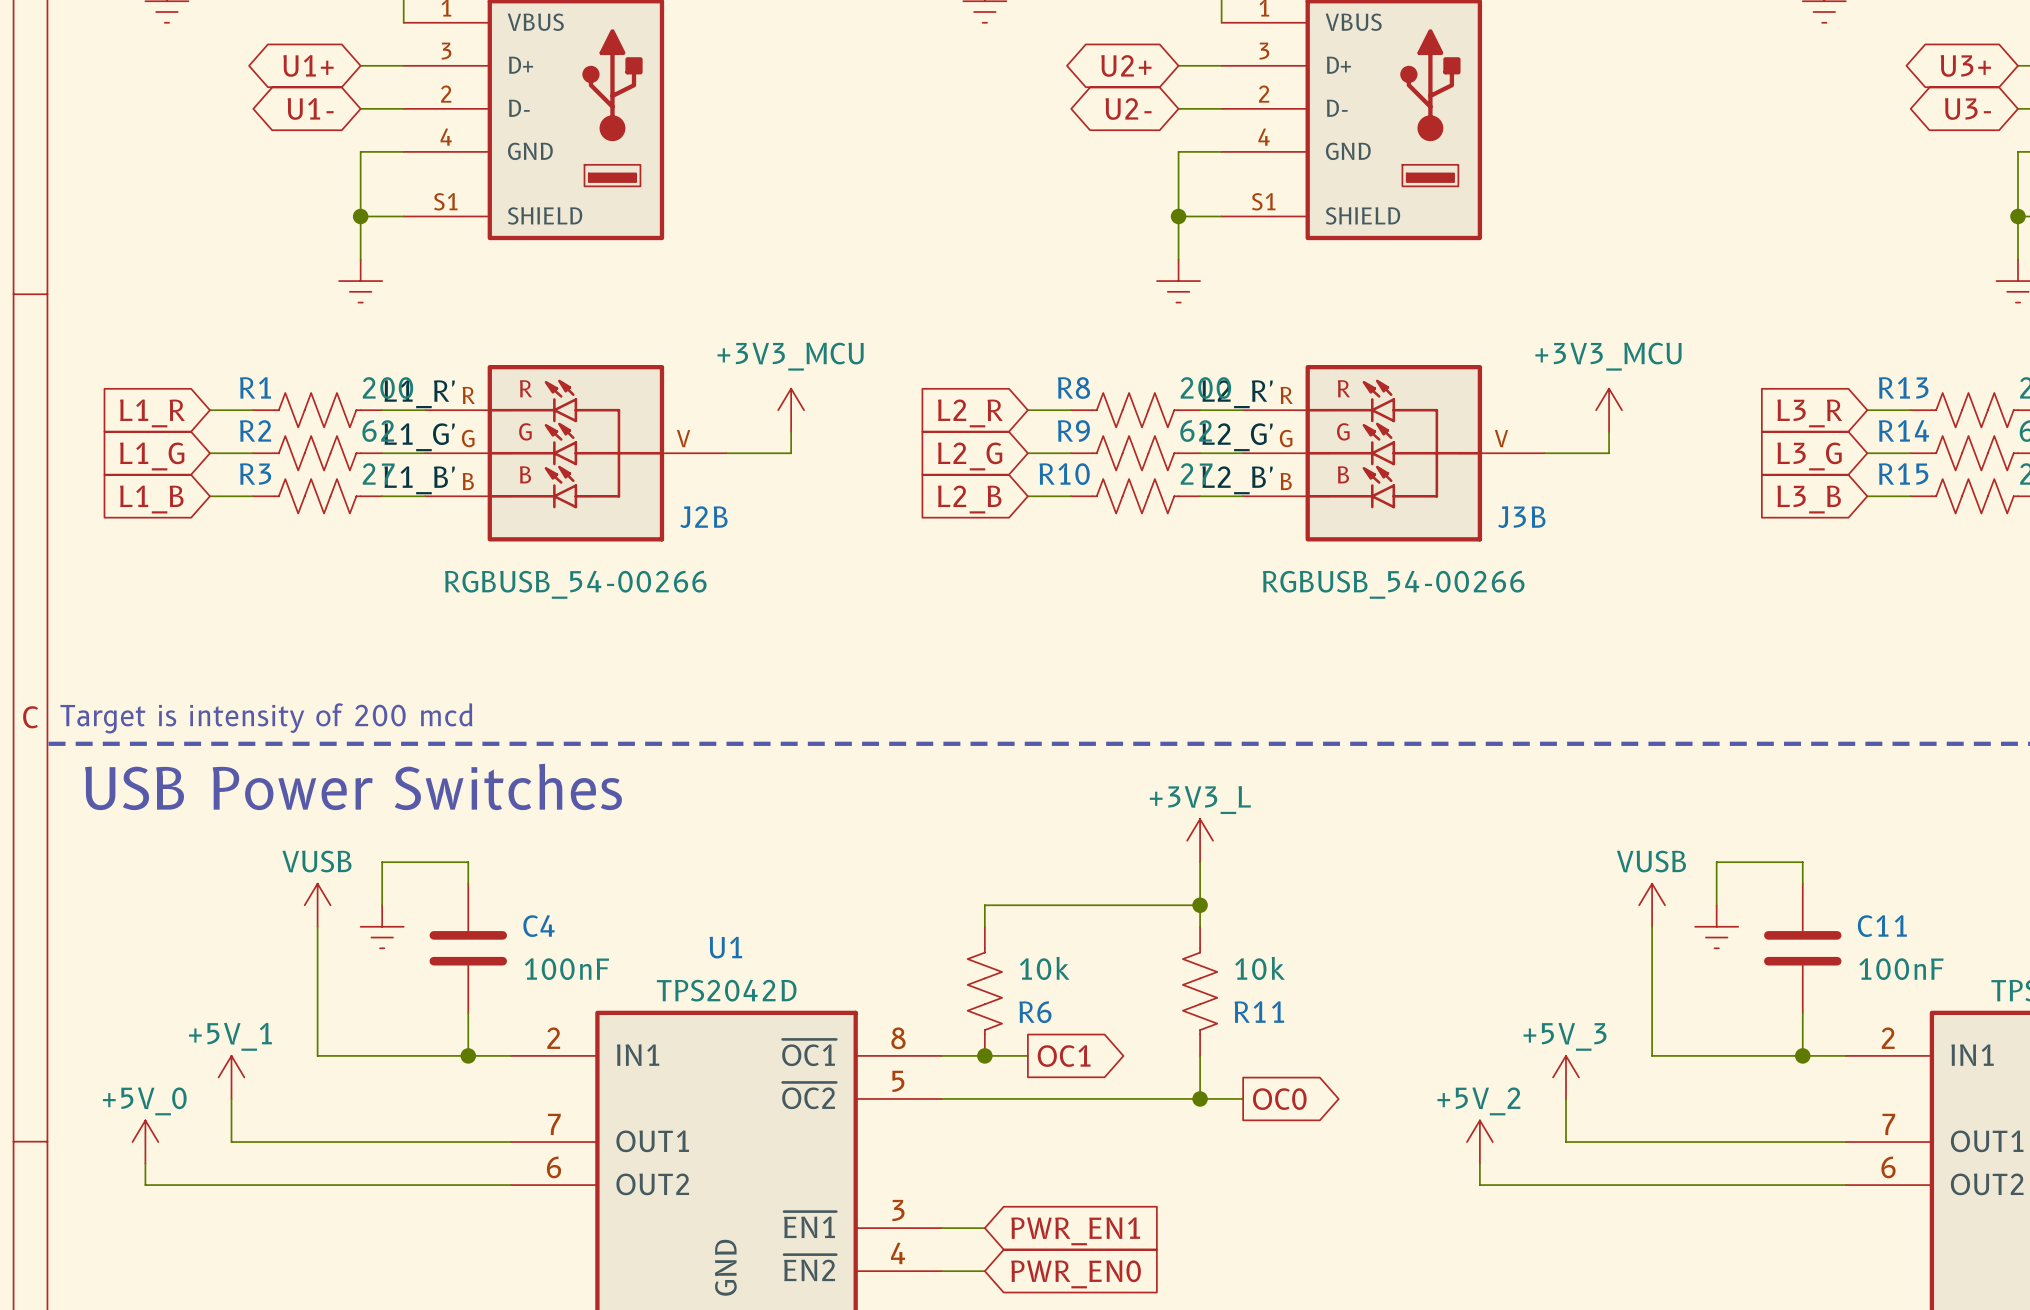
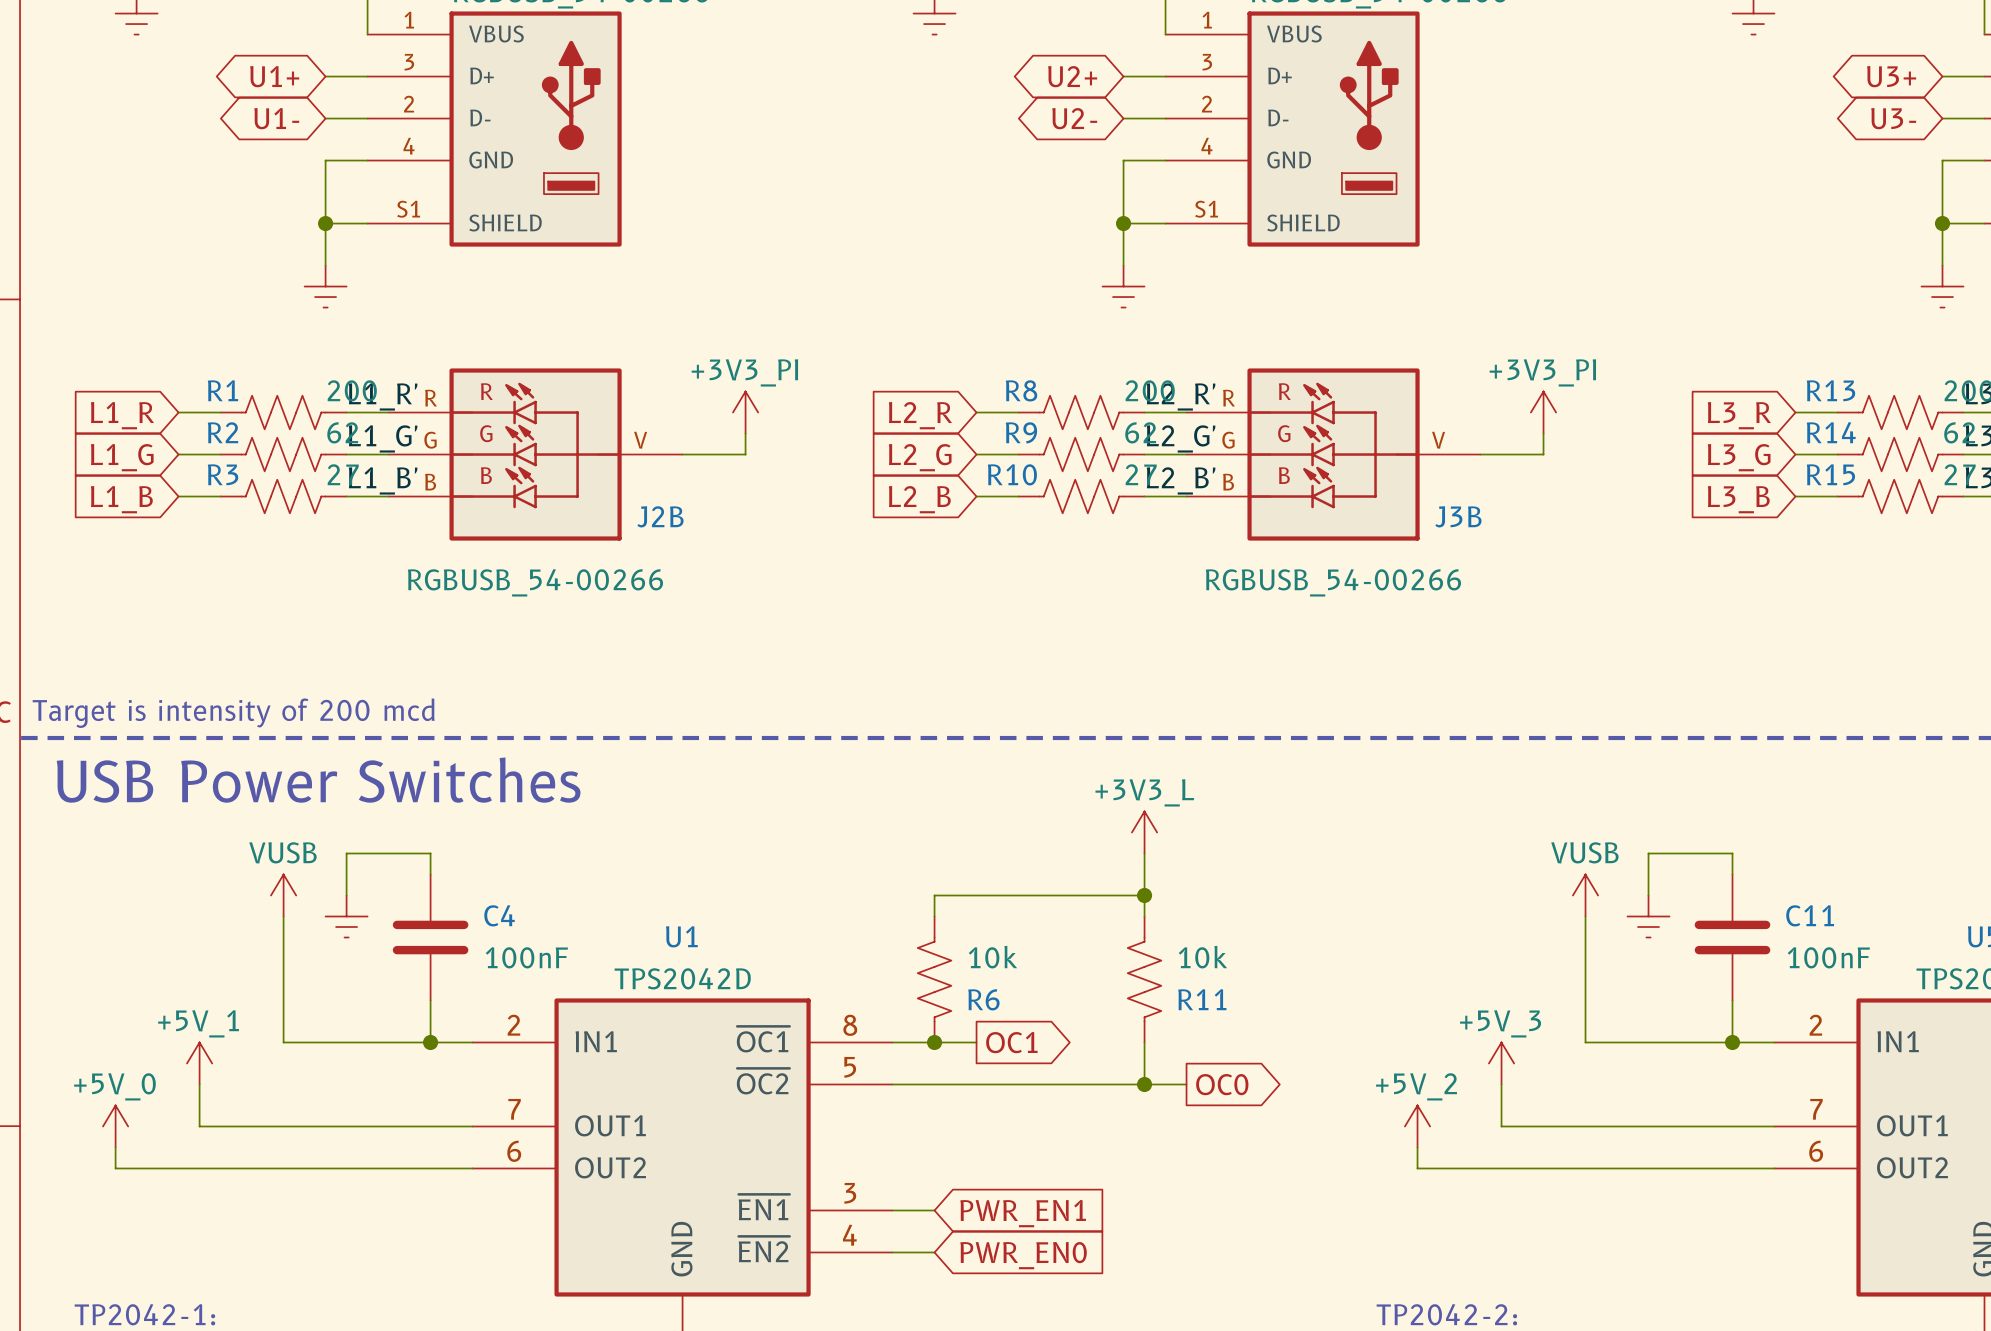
power symbol: +3V3_MCU (791, 410) -> +3V3_PI (745, 412)
power symbol: +3V3_MCU (1609, 410) -> +3V3_PI (1543, 412)

